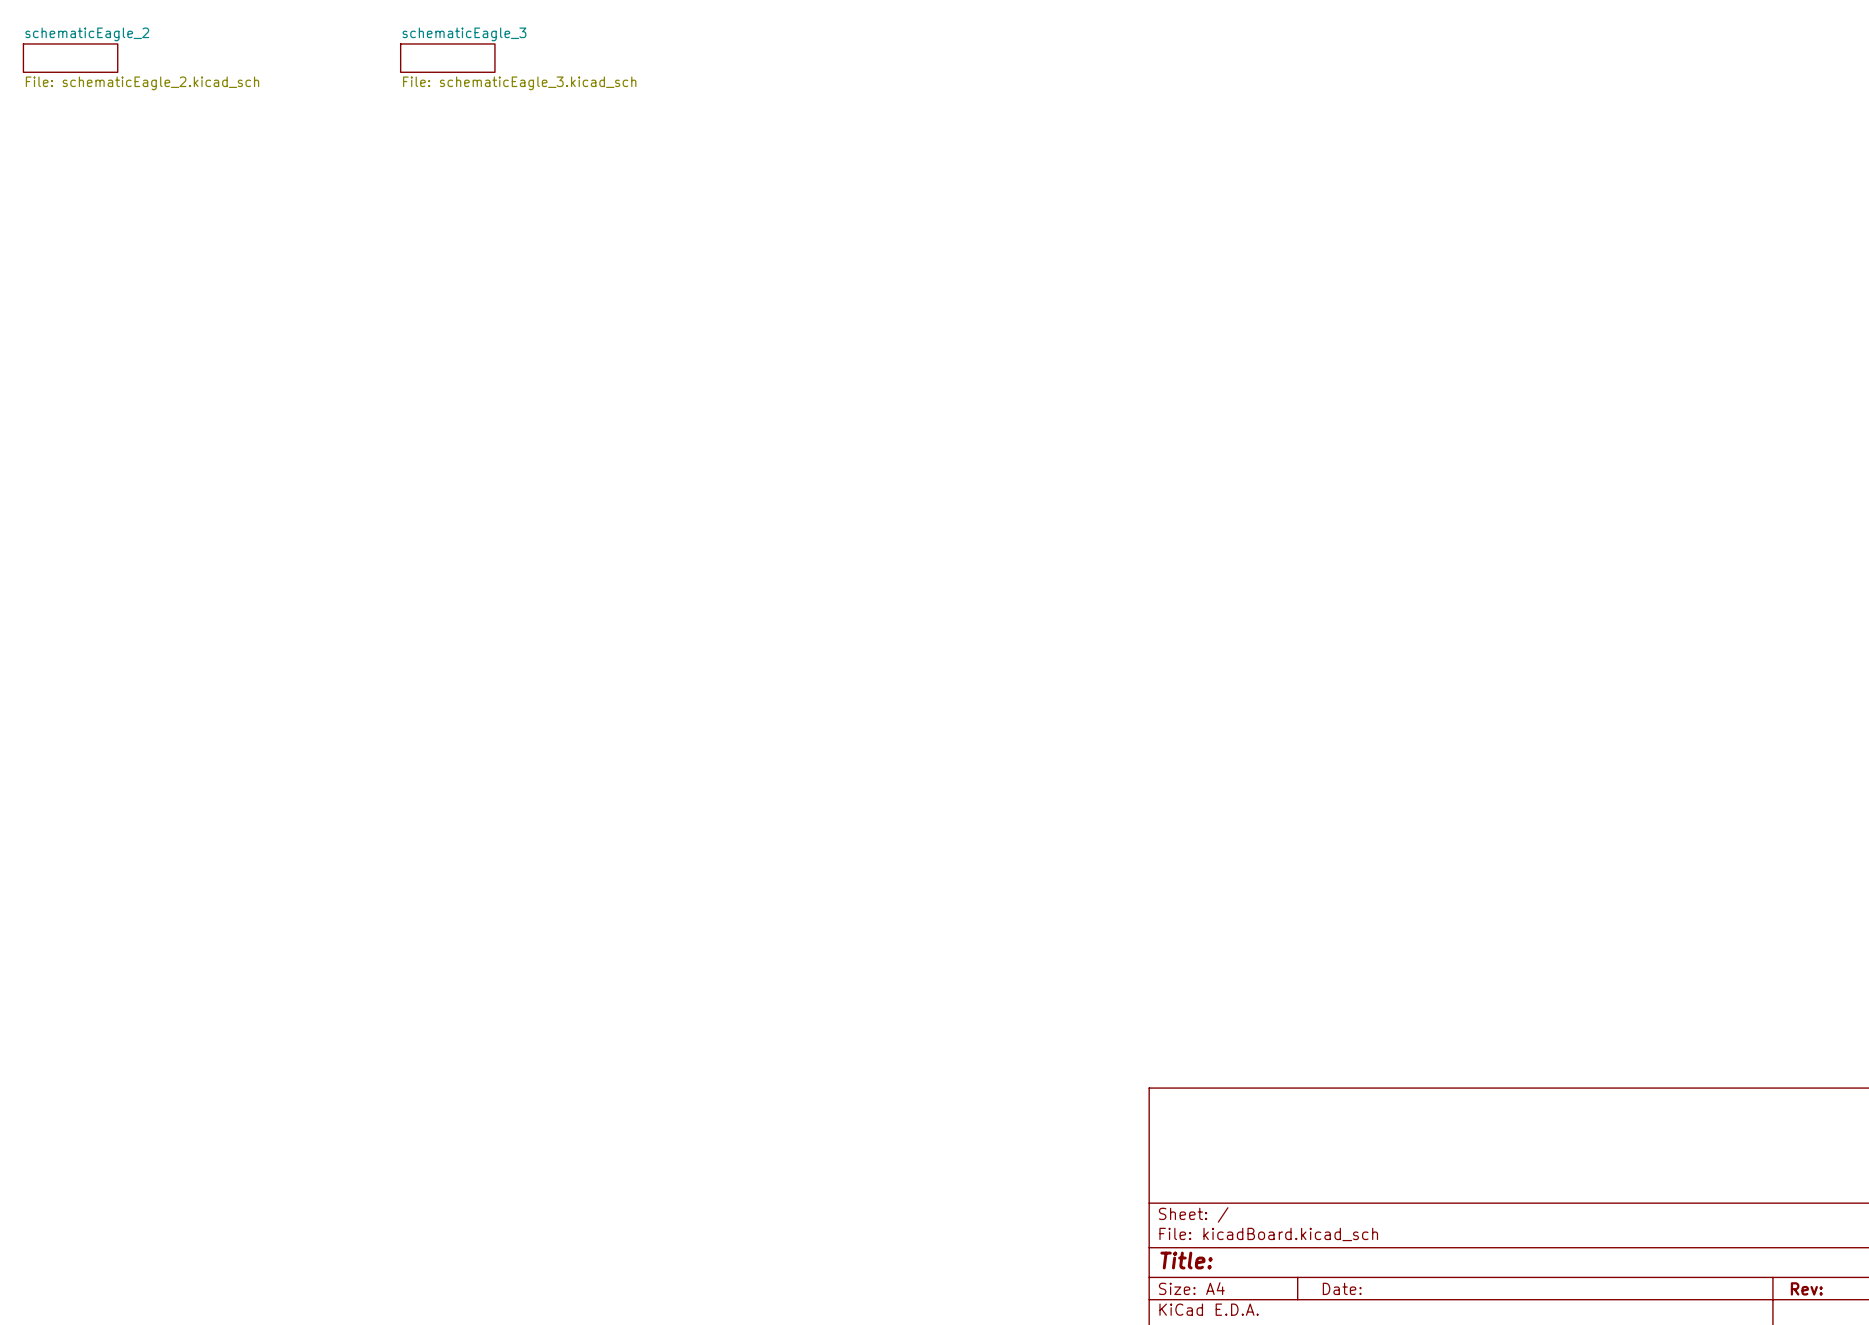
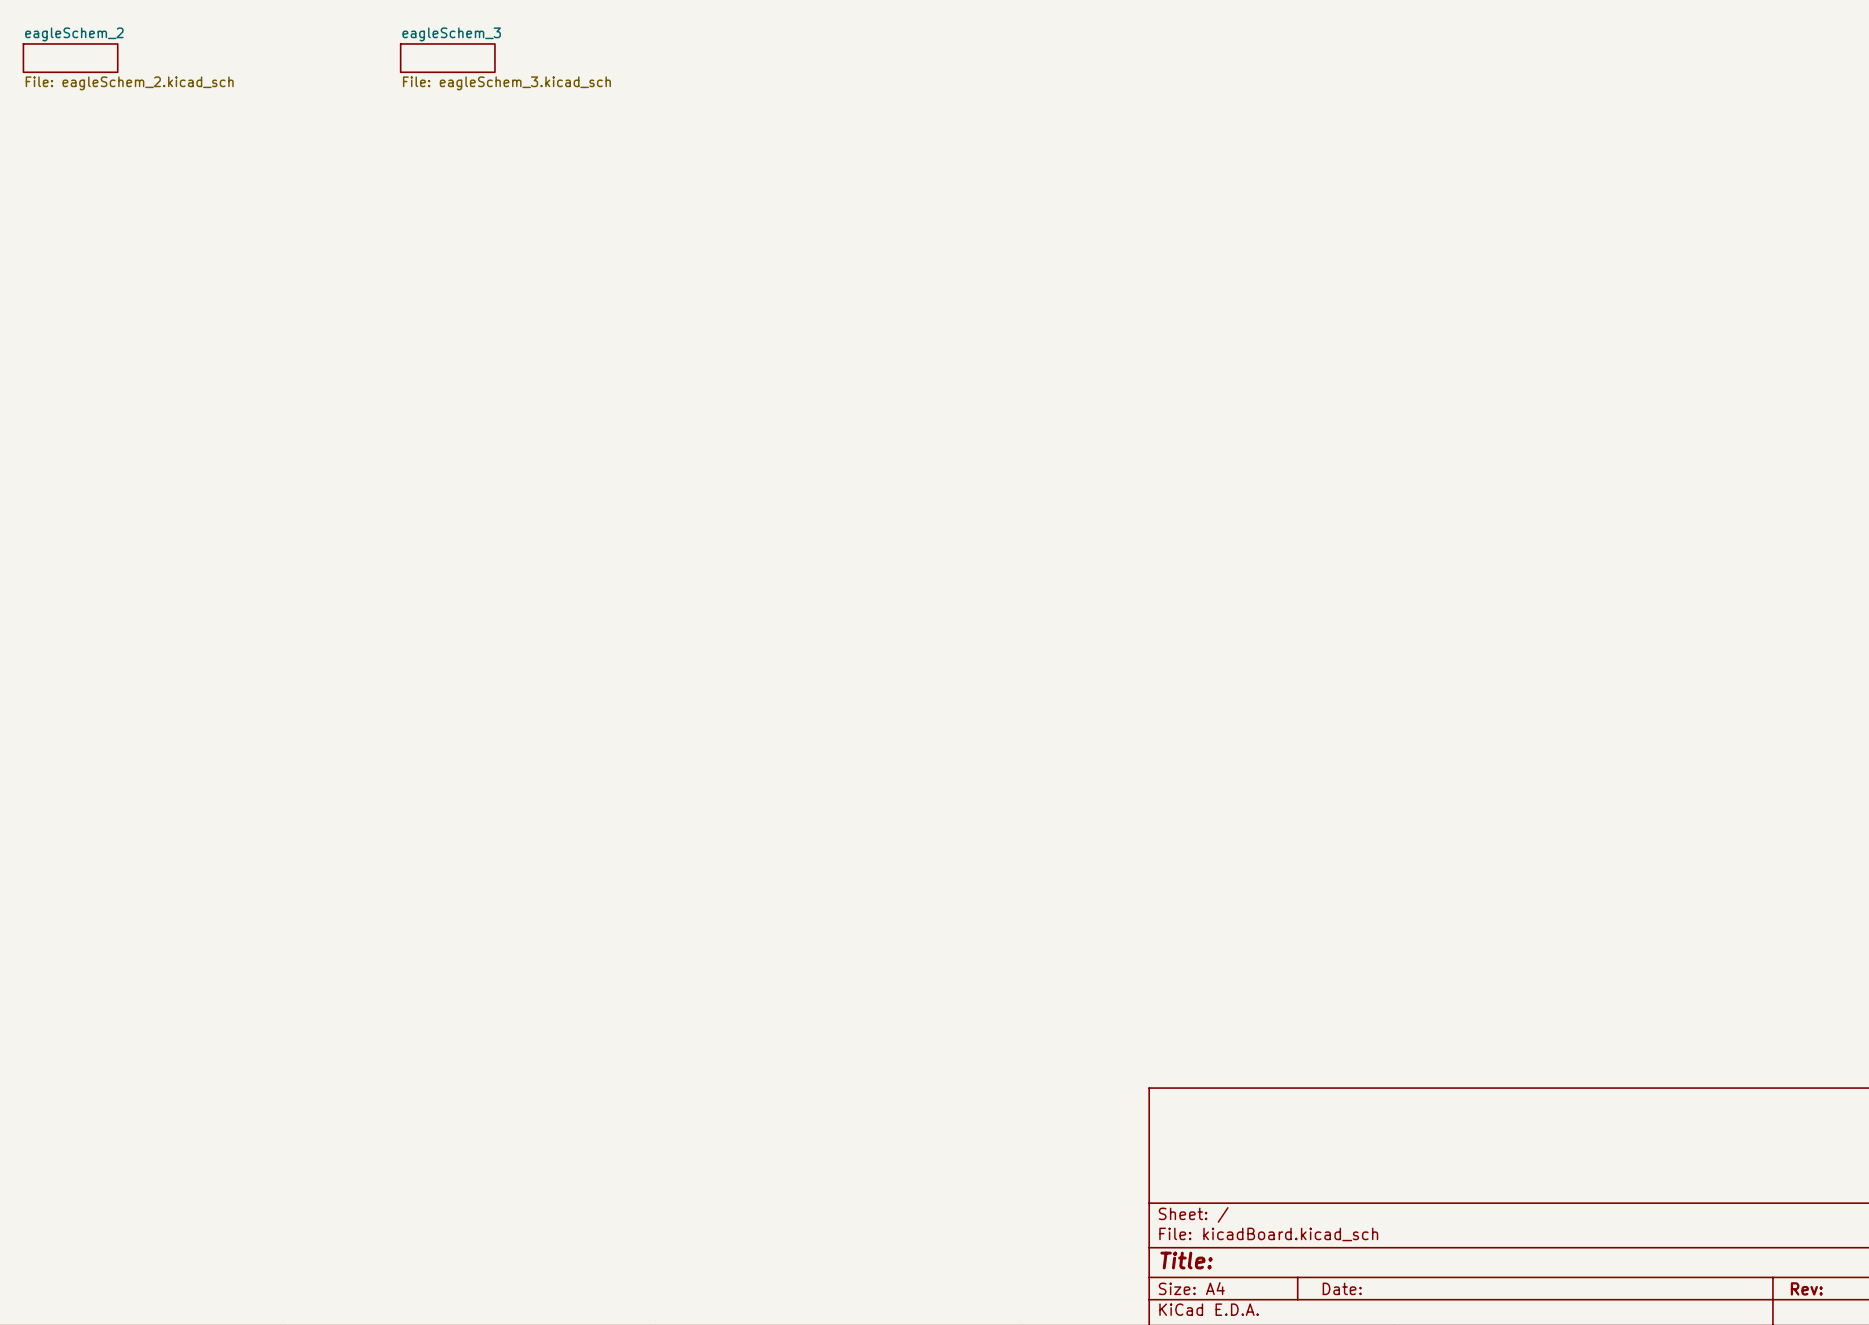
sheet schematicEagle_2 name: schematicEagle_2 (87, 34) -> eagleSchem_2 (74, 34)
sheet schematicEagle_3 name: schematicEagle_3 (464, 34) -> eagleSchem_3 (451, 34)
sheet schematicEagle_2 value: File: schematicEagle_2.kicad_sch (142, 83) -> File: eagleSchem_2.kicad_sch (129, 83)
sheet schematicEagle_3 value: File: schematicEagle_3.kicad_sch (519, 83) -> File: eagleSchem_3.kicad_sch (506, 83)

